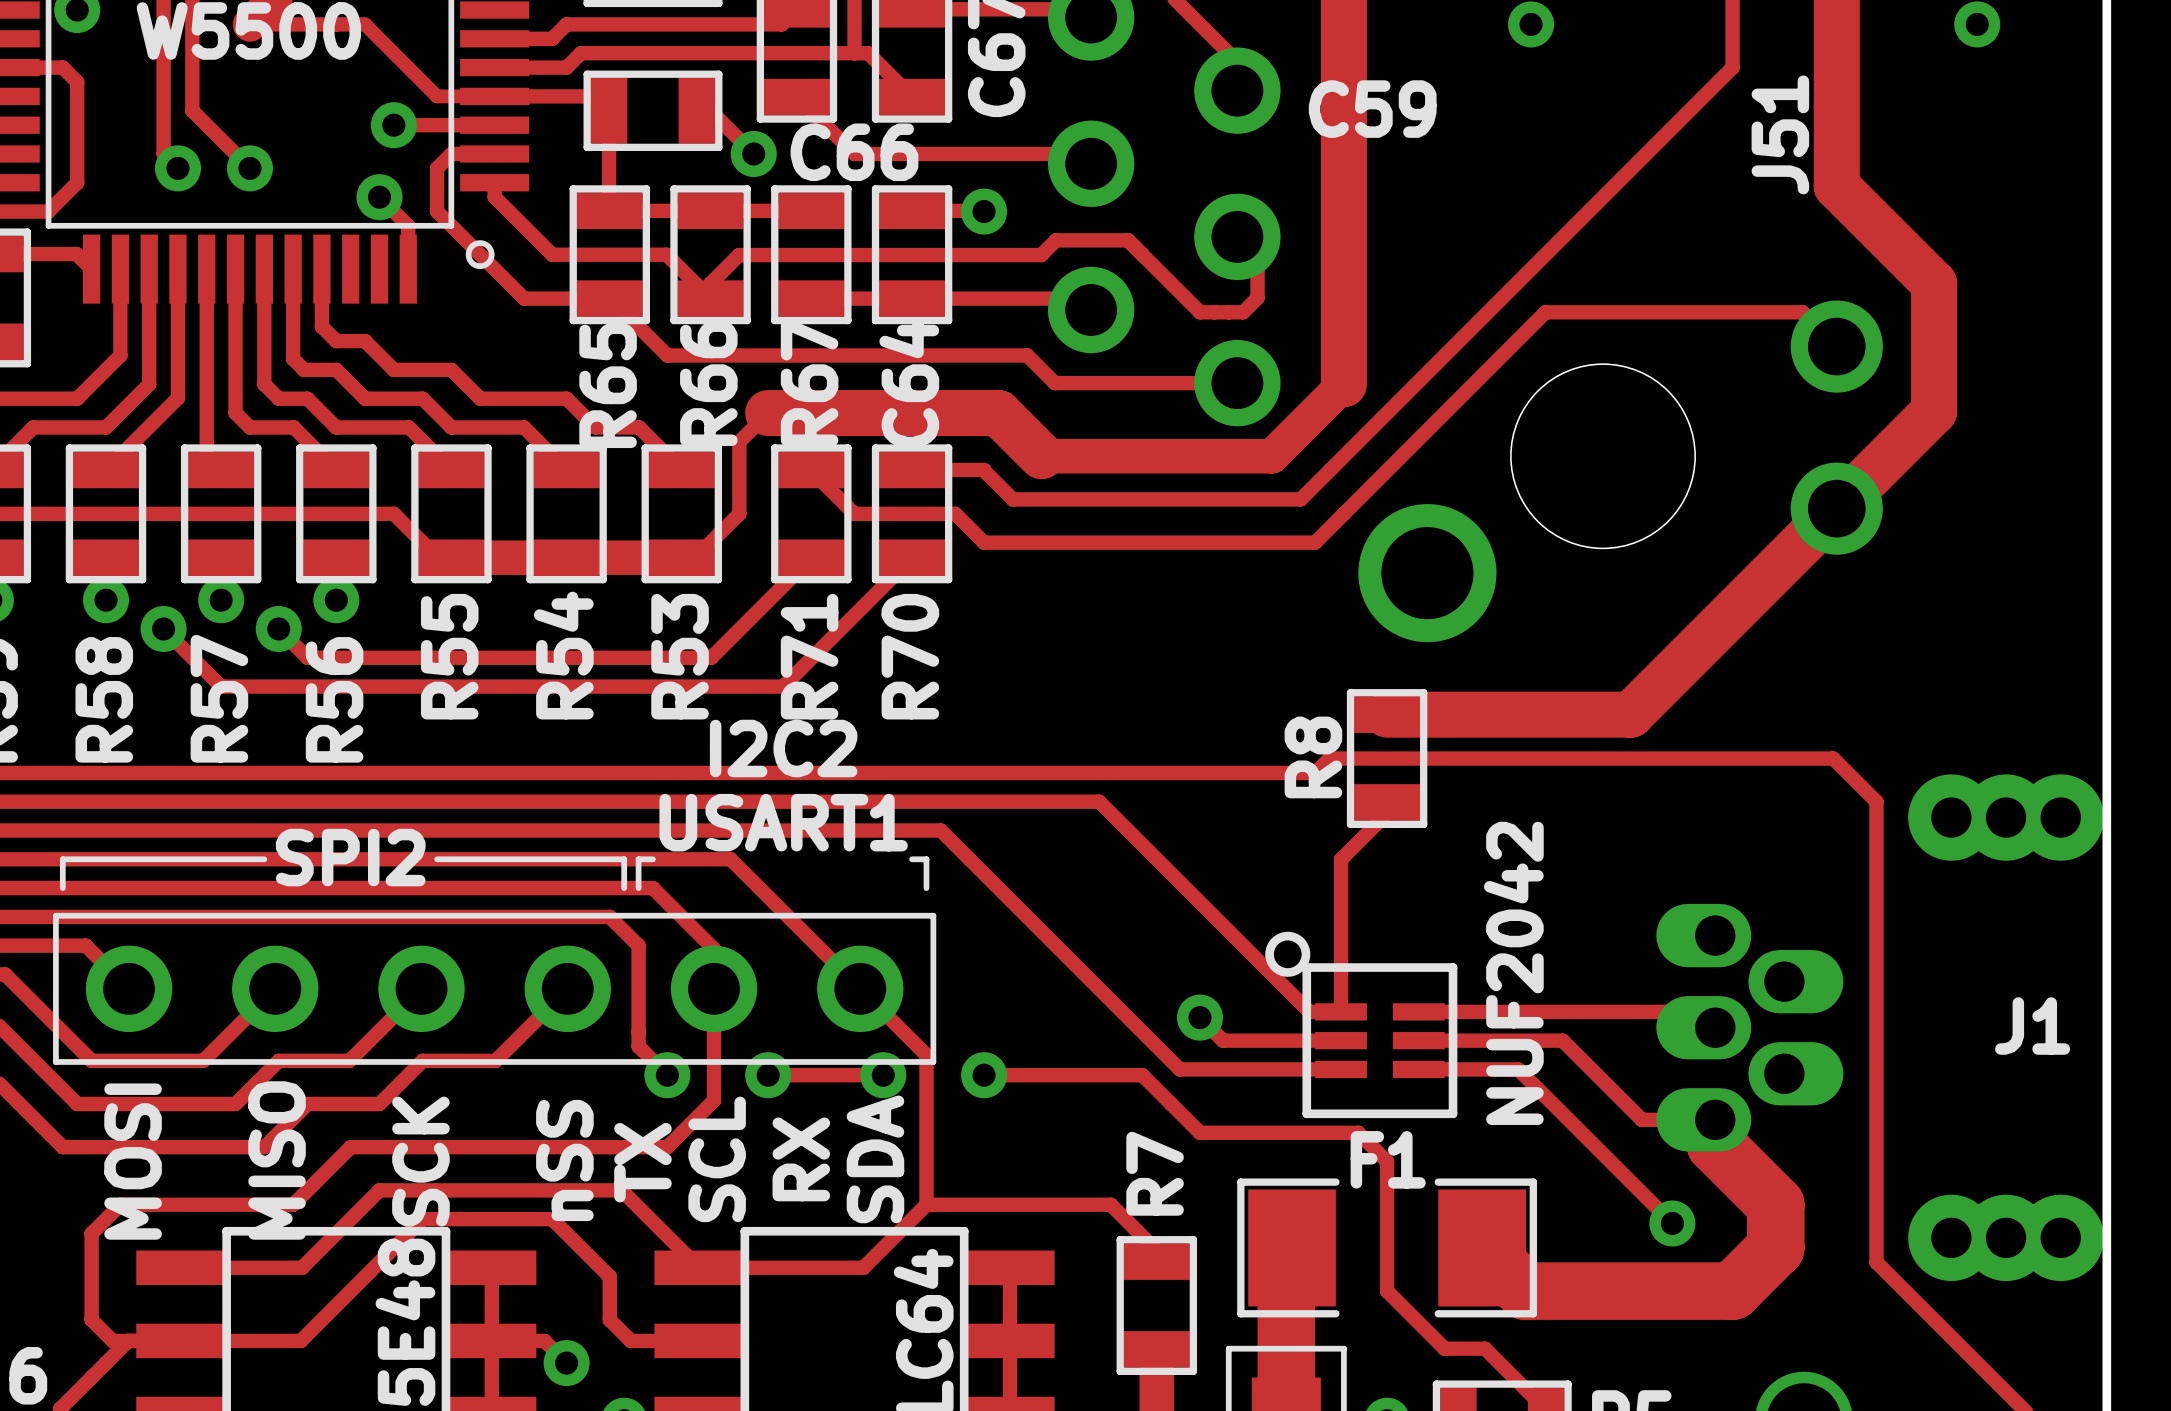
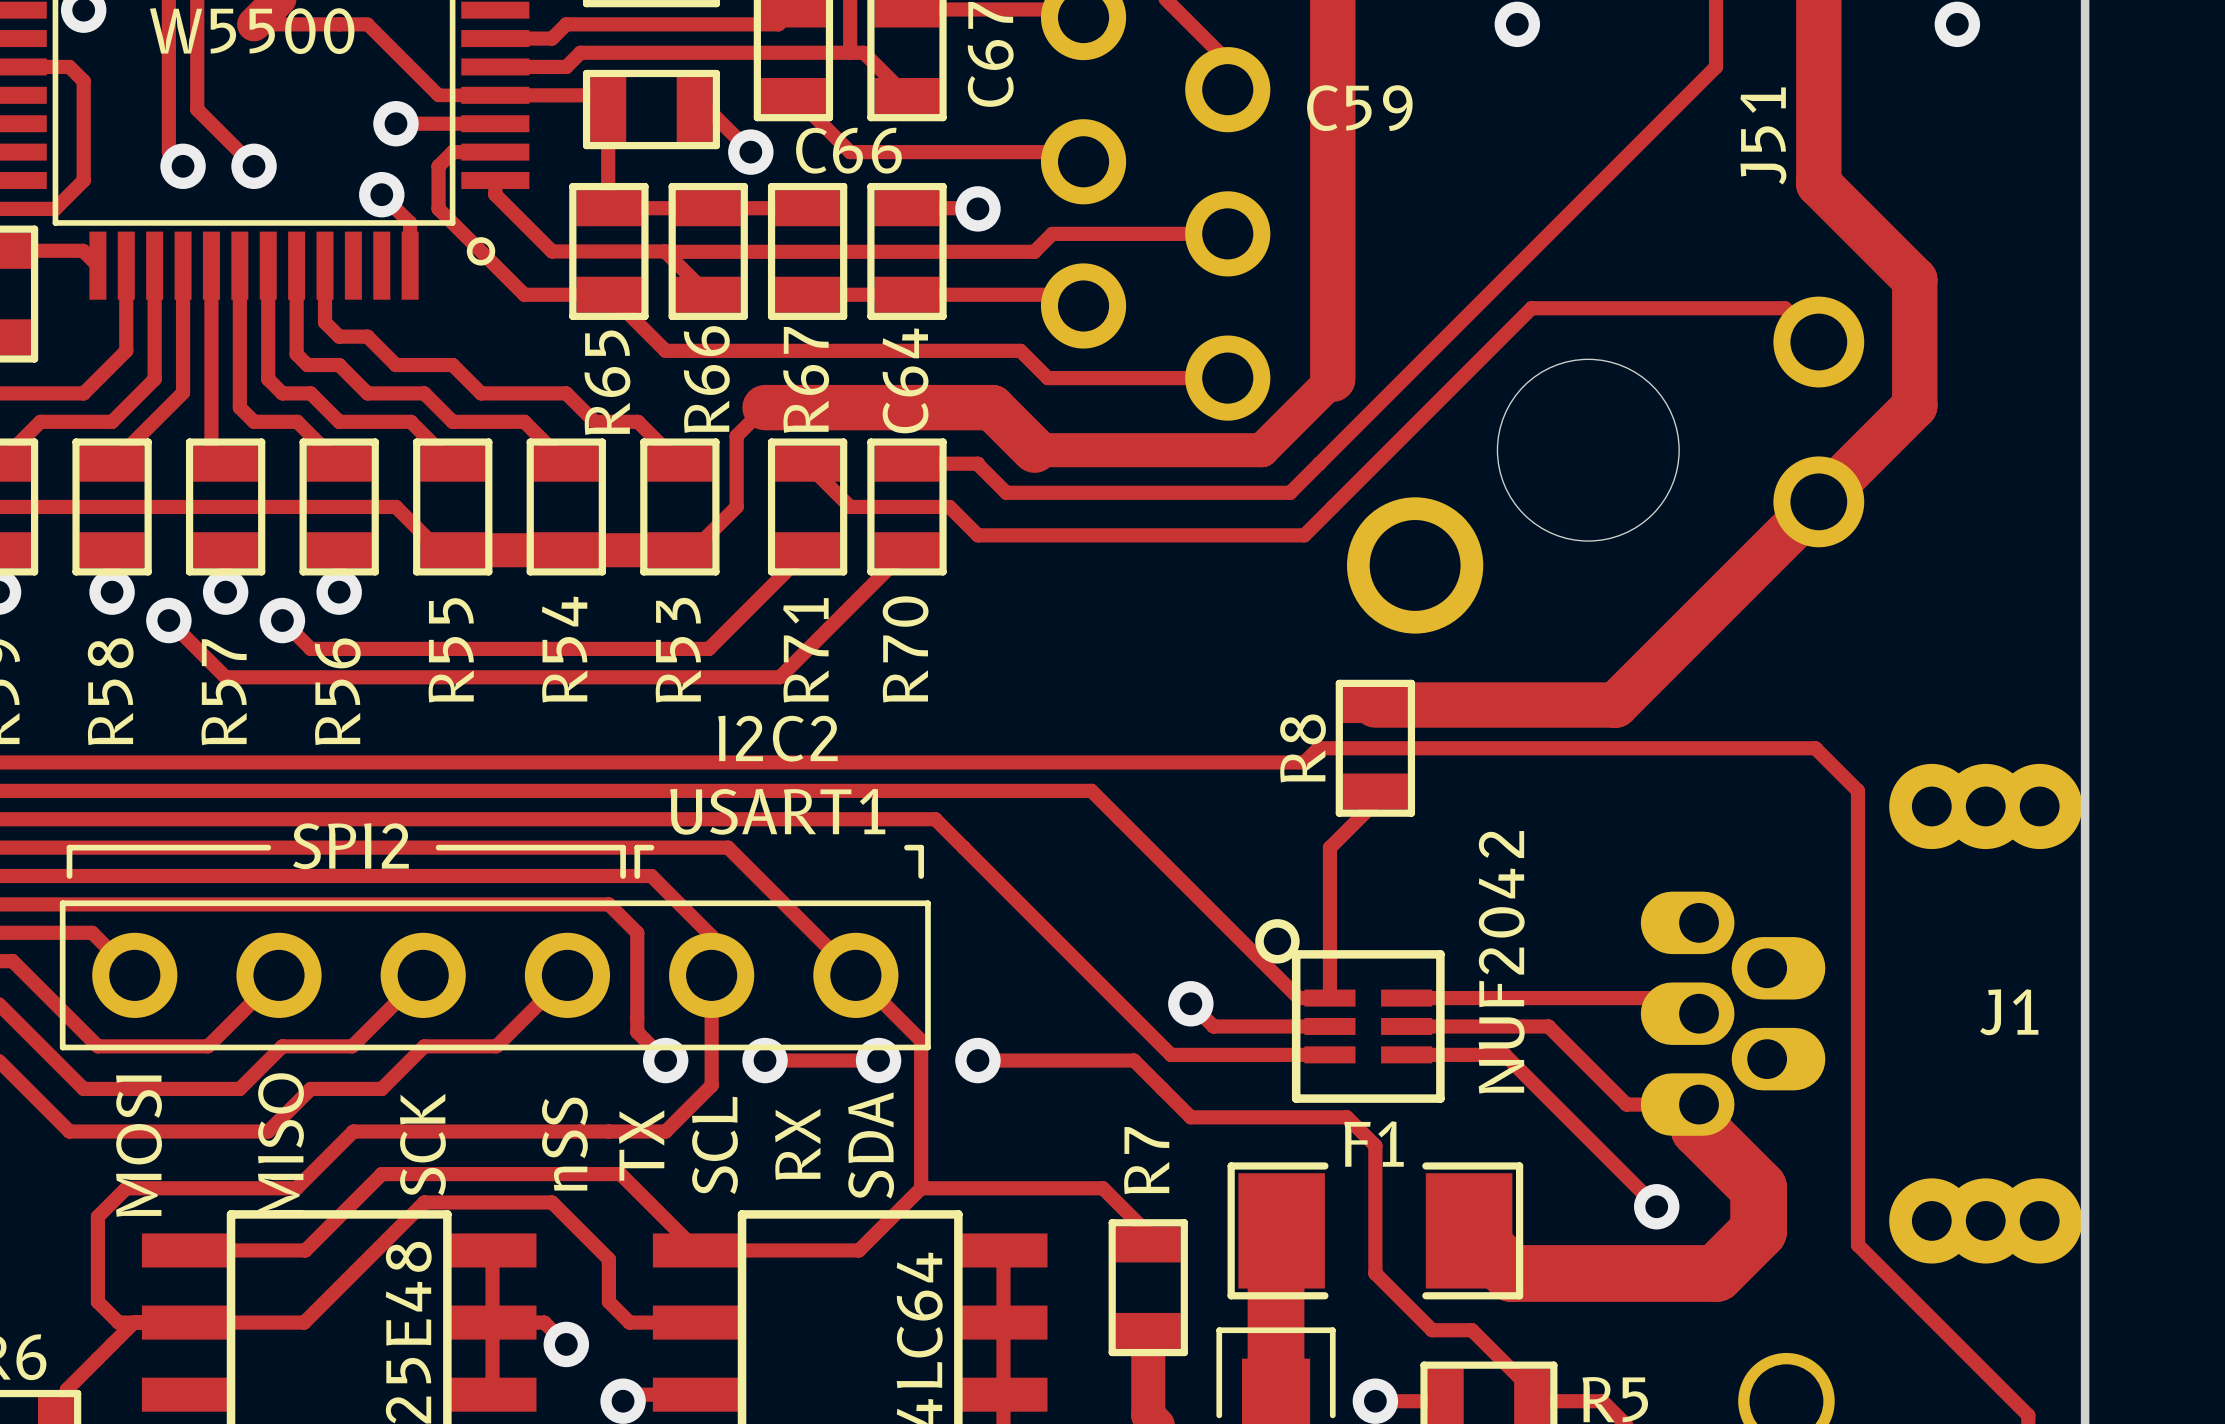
track: (1237, 236) (1257, 257) (1257, 297) (1243, 312) (1199, 312) (1128, 240) (1056, 240) -> (1227, 233) (1052, 233) (1048, 237)
track: (739, 255) (710, 283) (710, 298) -> (736, 251) (665, 251)

